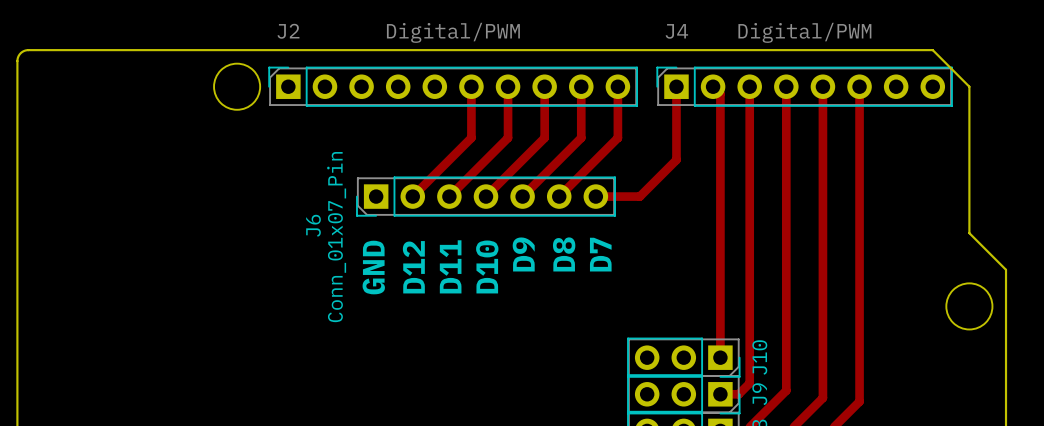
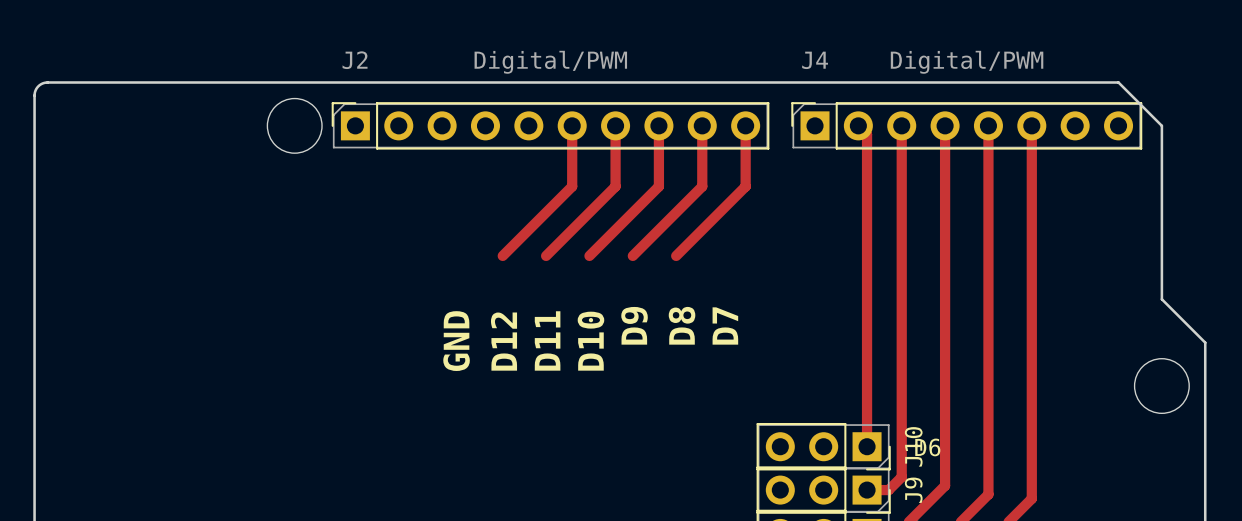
top track: (676, 86) (676, 159) (639, 196) (595, 196) -> none
J6: Conn_01x07_Pin (486, 196) -> none
text: none -> D6 (927, 447)

